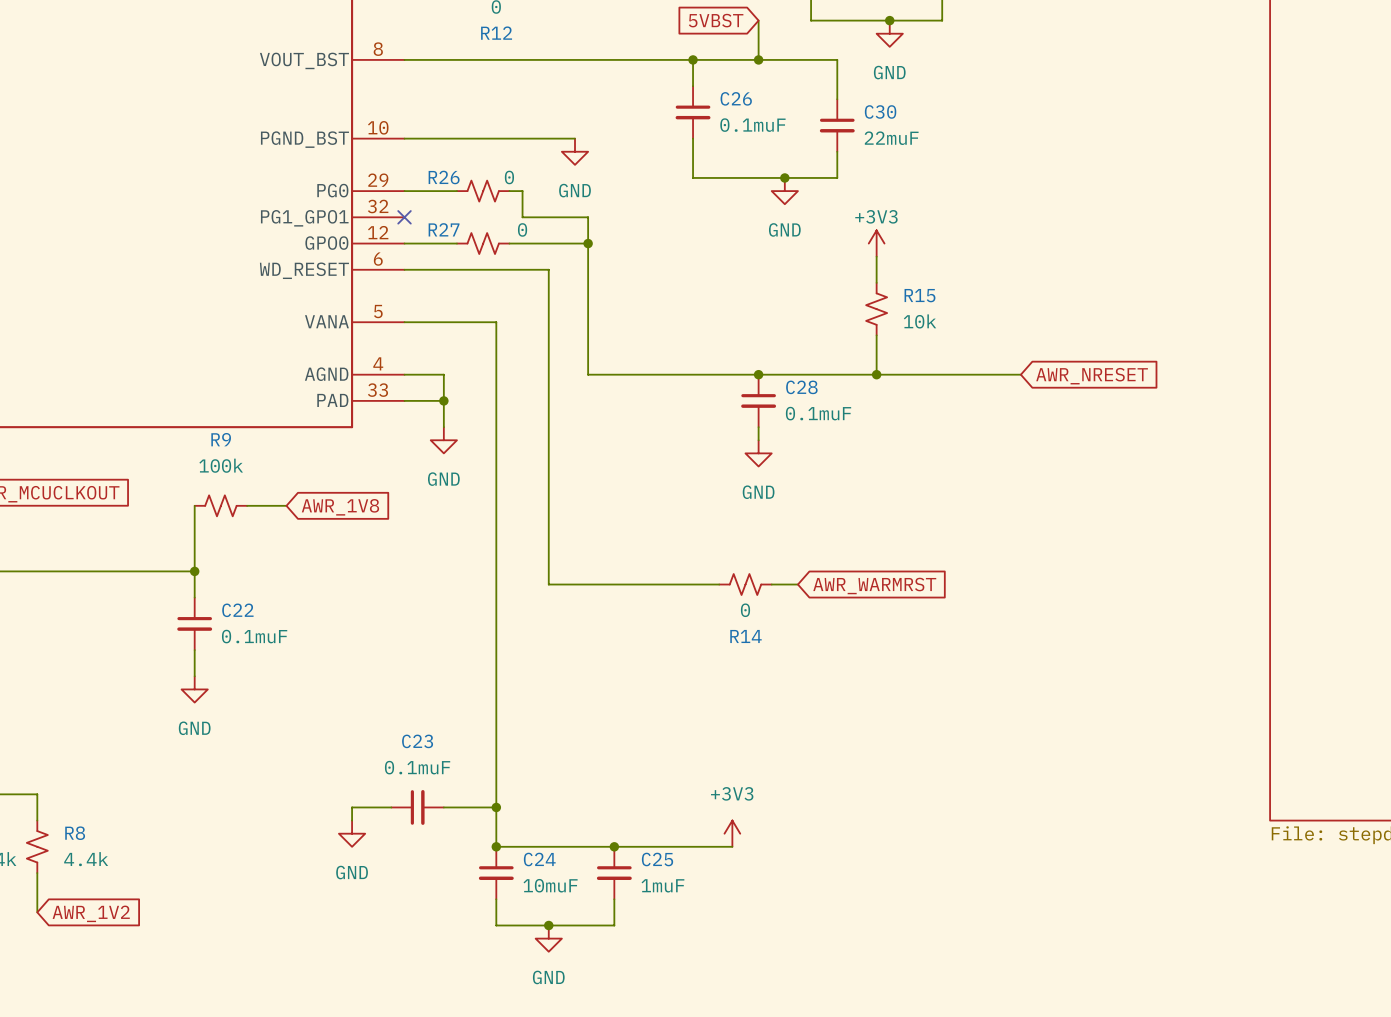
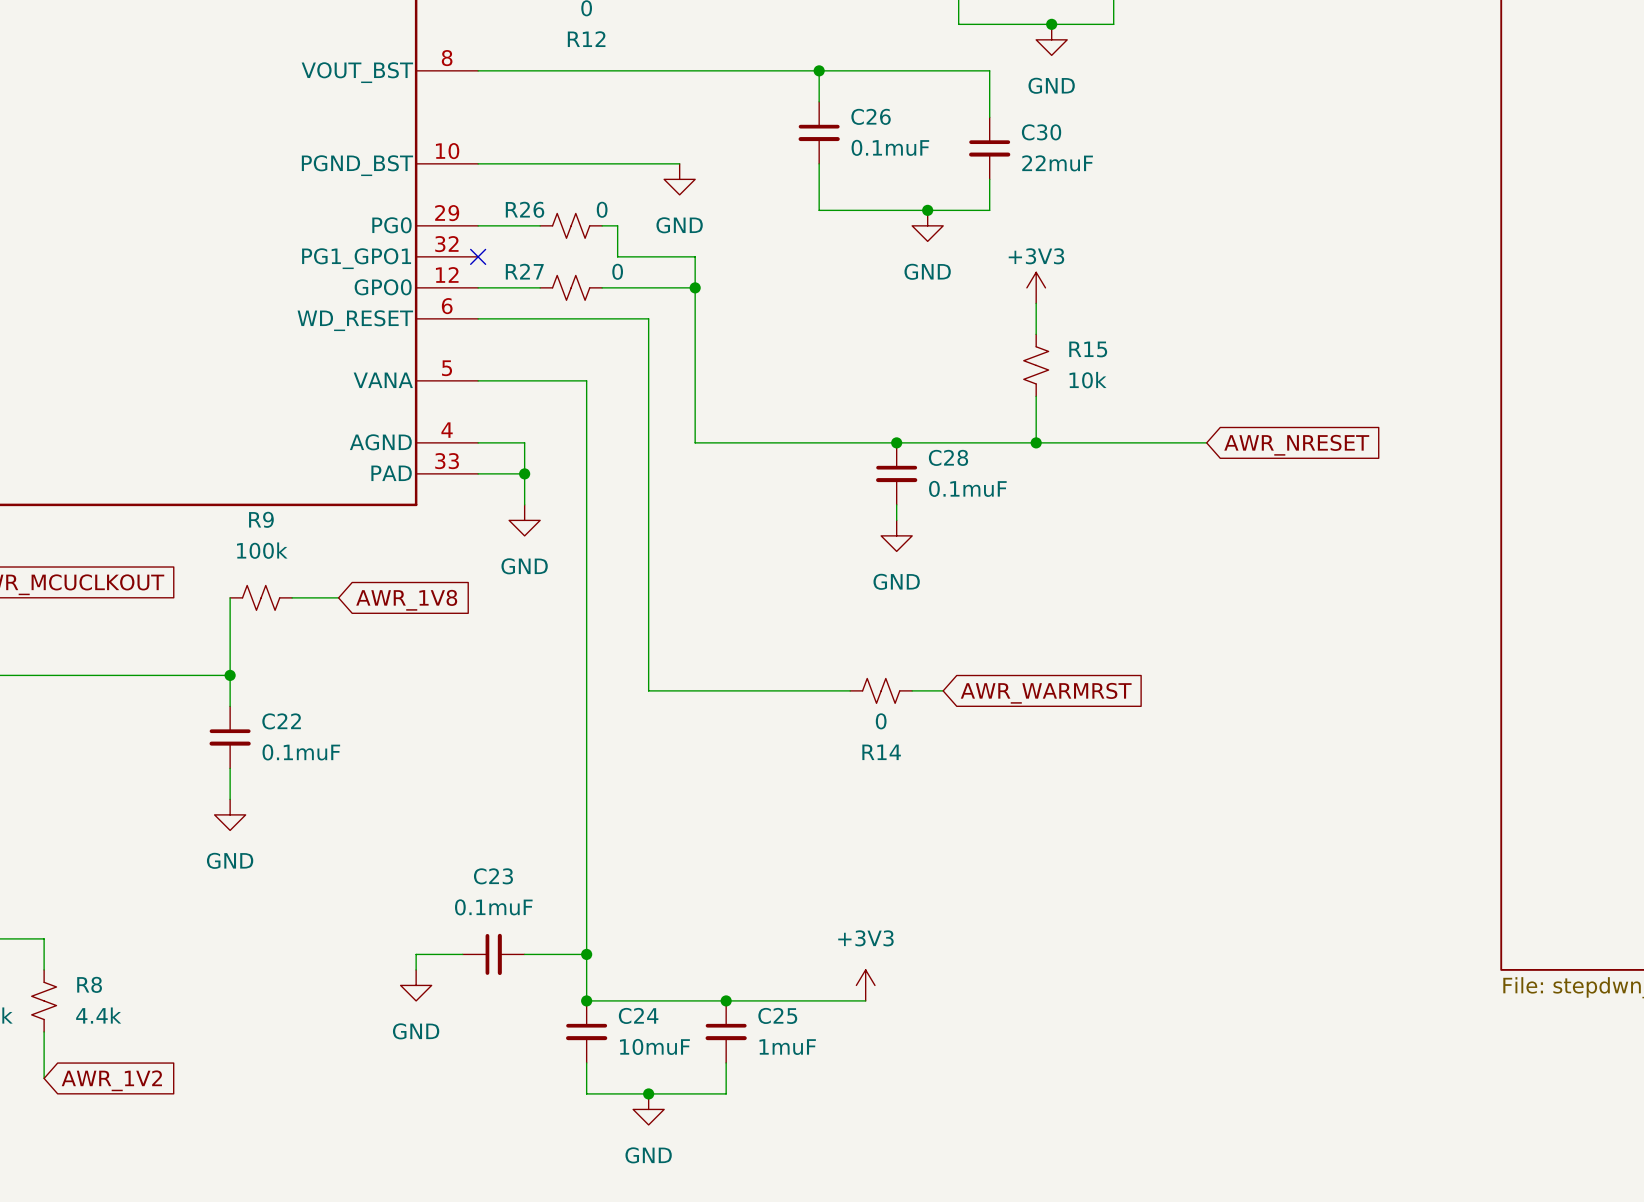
global label: 5VBST (716, 20) -> none
wire: (758, 20) (758, 59) -> none
junction: (758, 59) -> none

